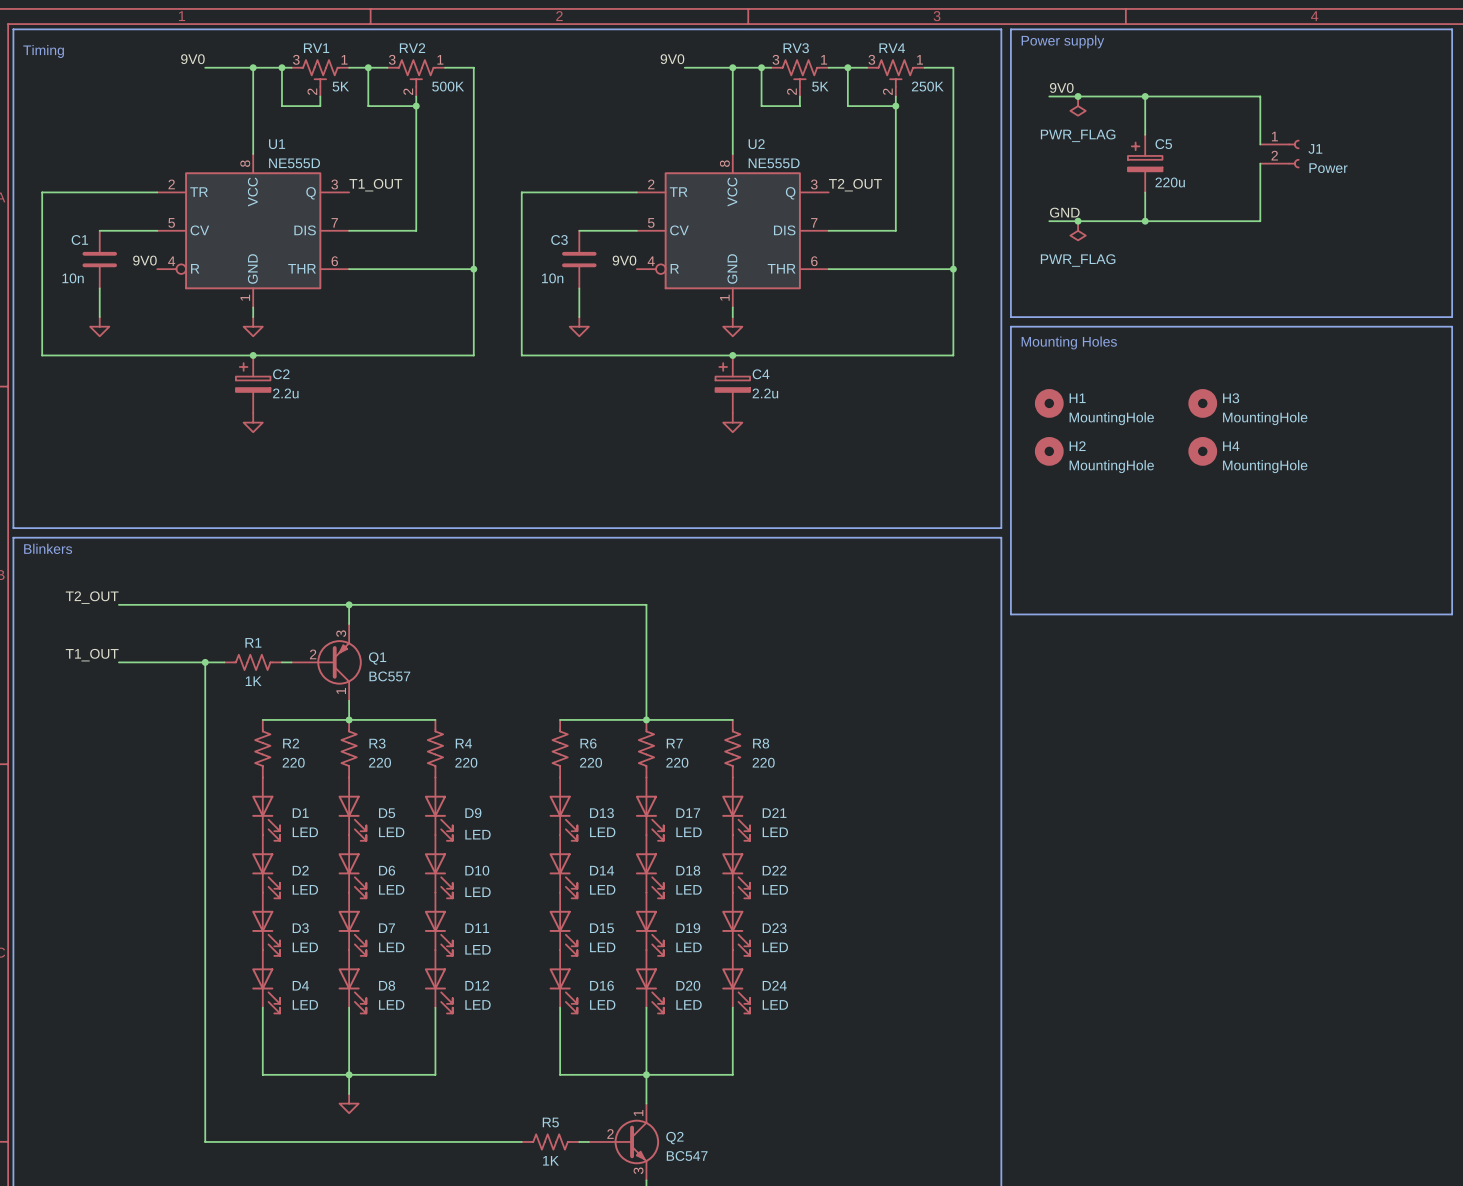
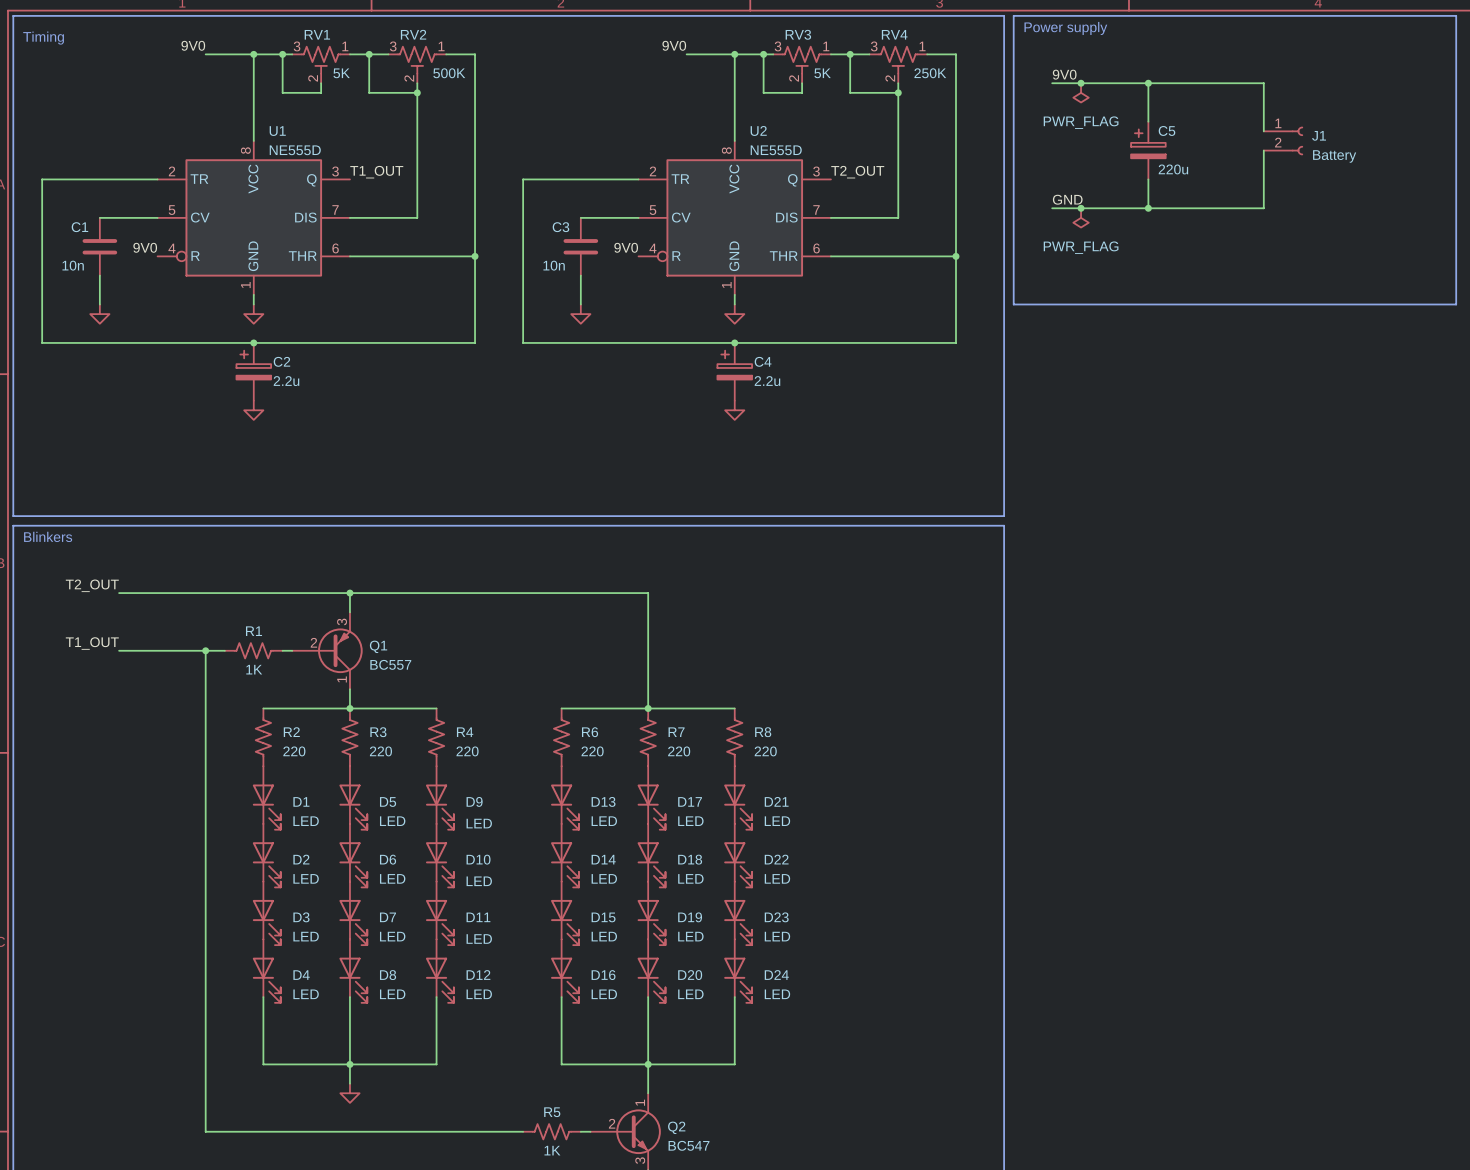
J1 value: Power (1328, 168) -> Battery (1334, 156)
line: (1010, 326) (1452, 326) (1452, 614) (1010, 614) (1010, 326) -> none
text: Mounting Holes (1069, 342) -> none
H1: MountingHole (1049, 403) -> none
H3: MountingHole (1202, 403) -> none
H2: MountingHole (1049, 451) -> none
H4: MountingHole (1202, 451) -> none

